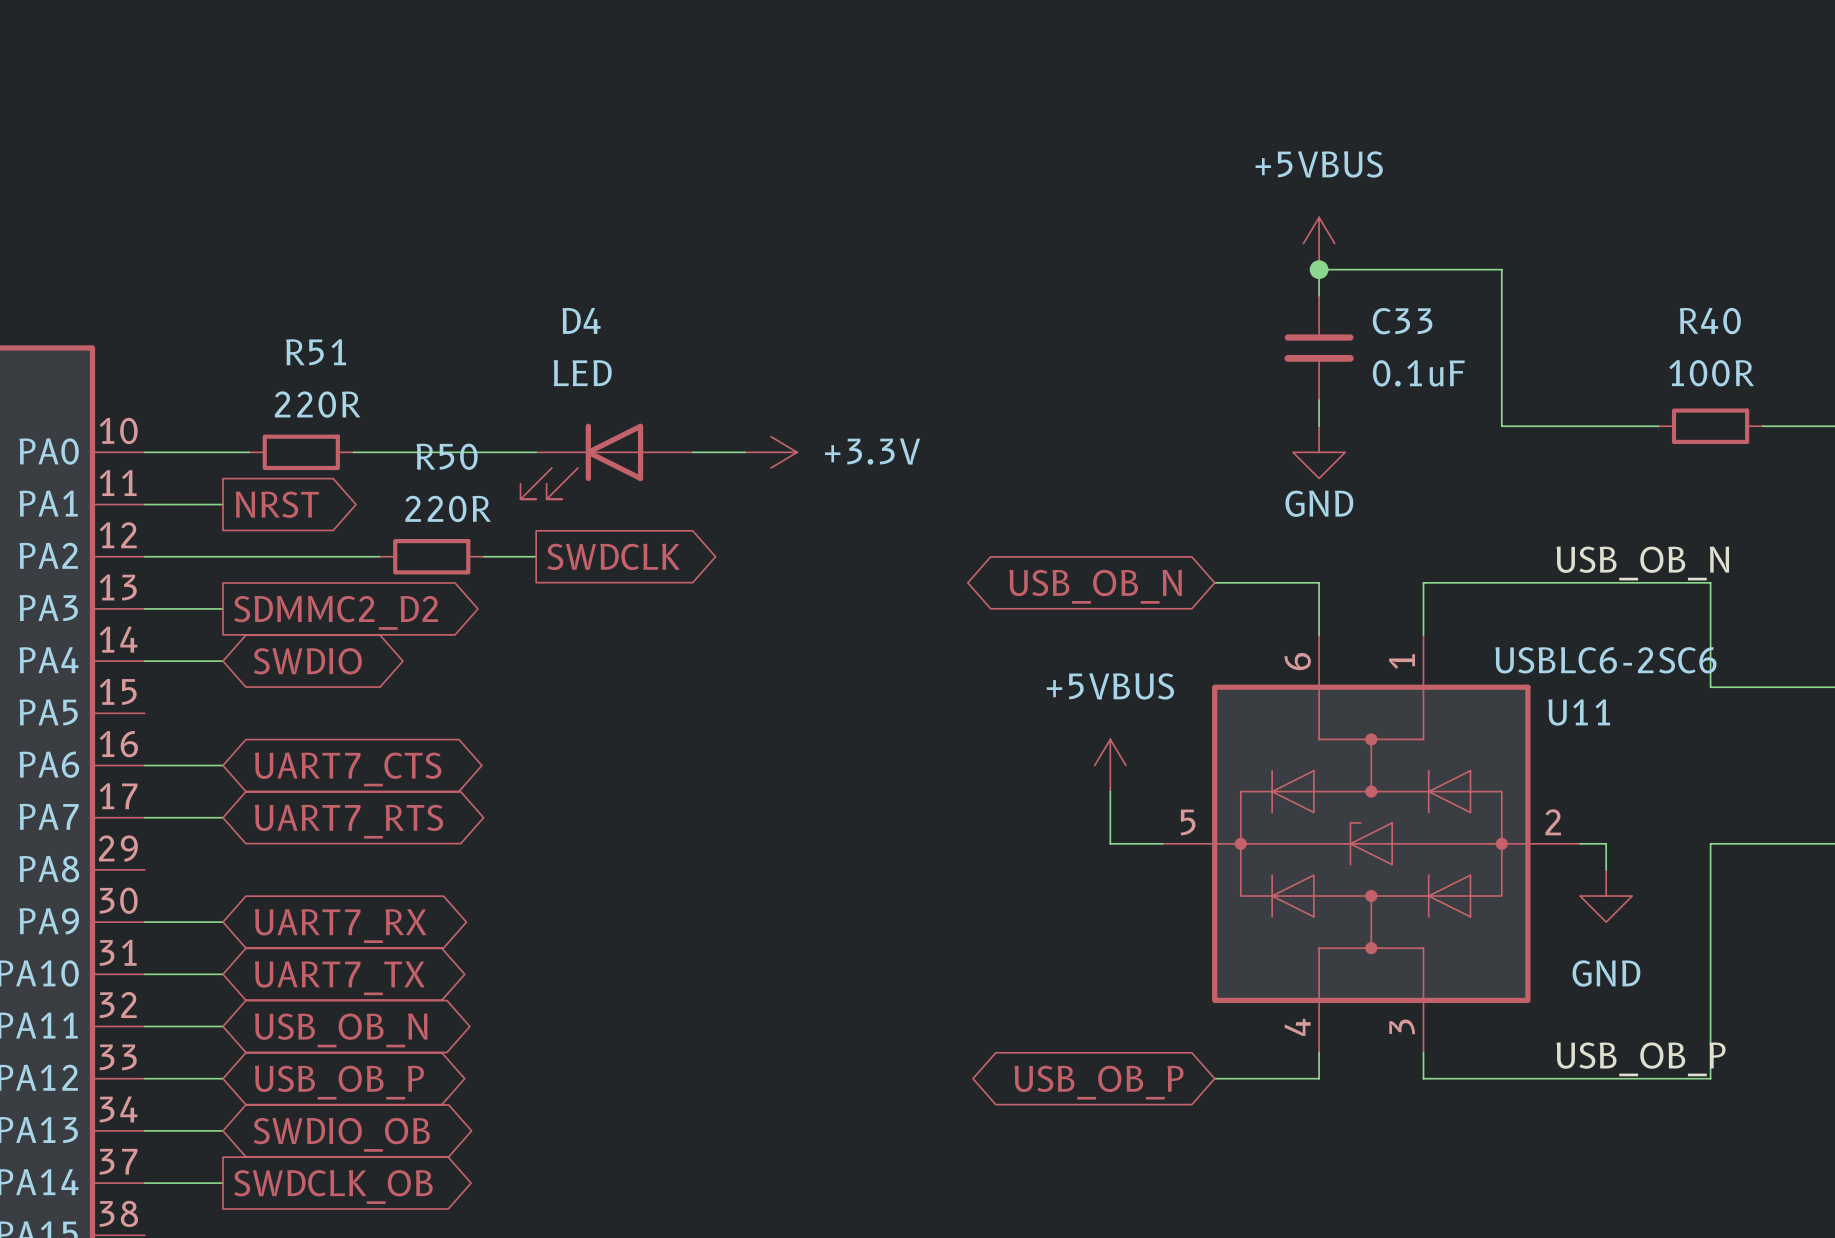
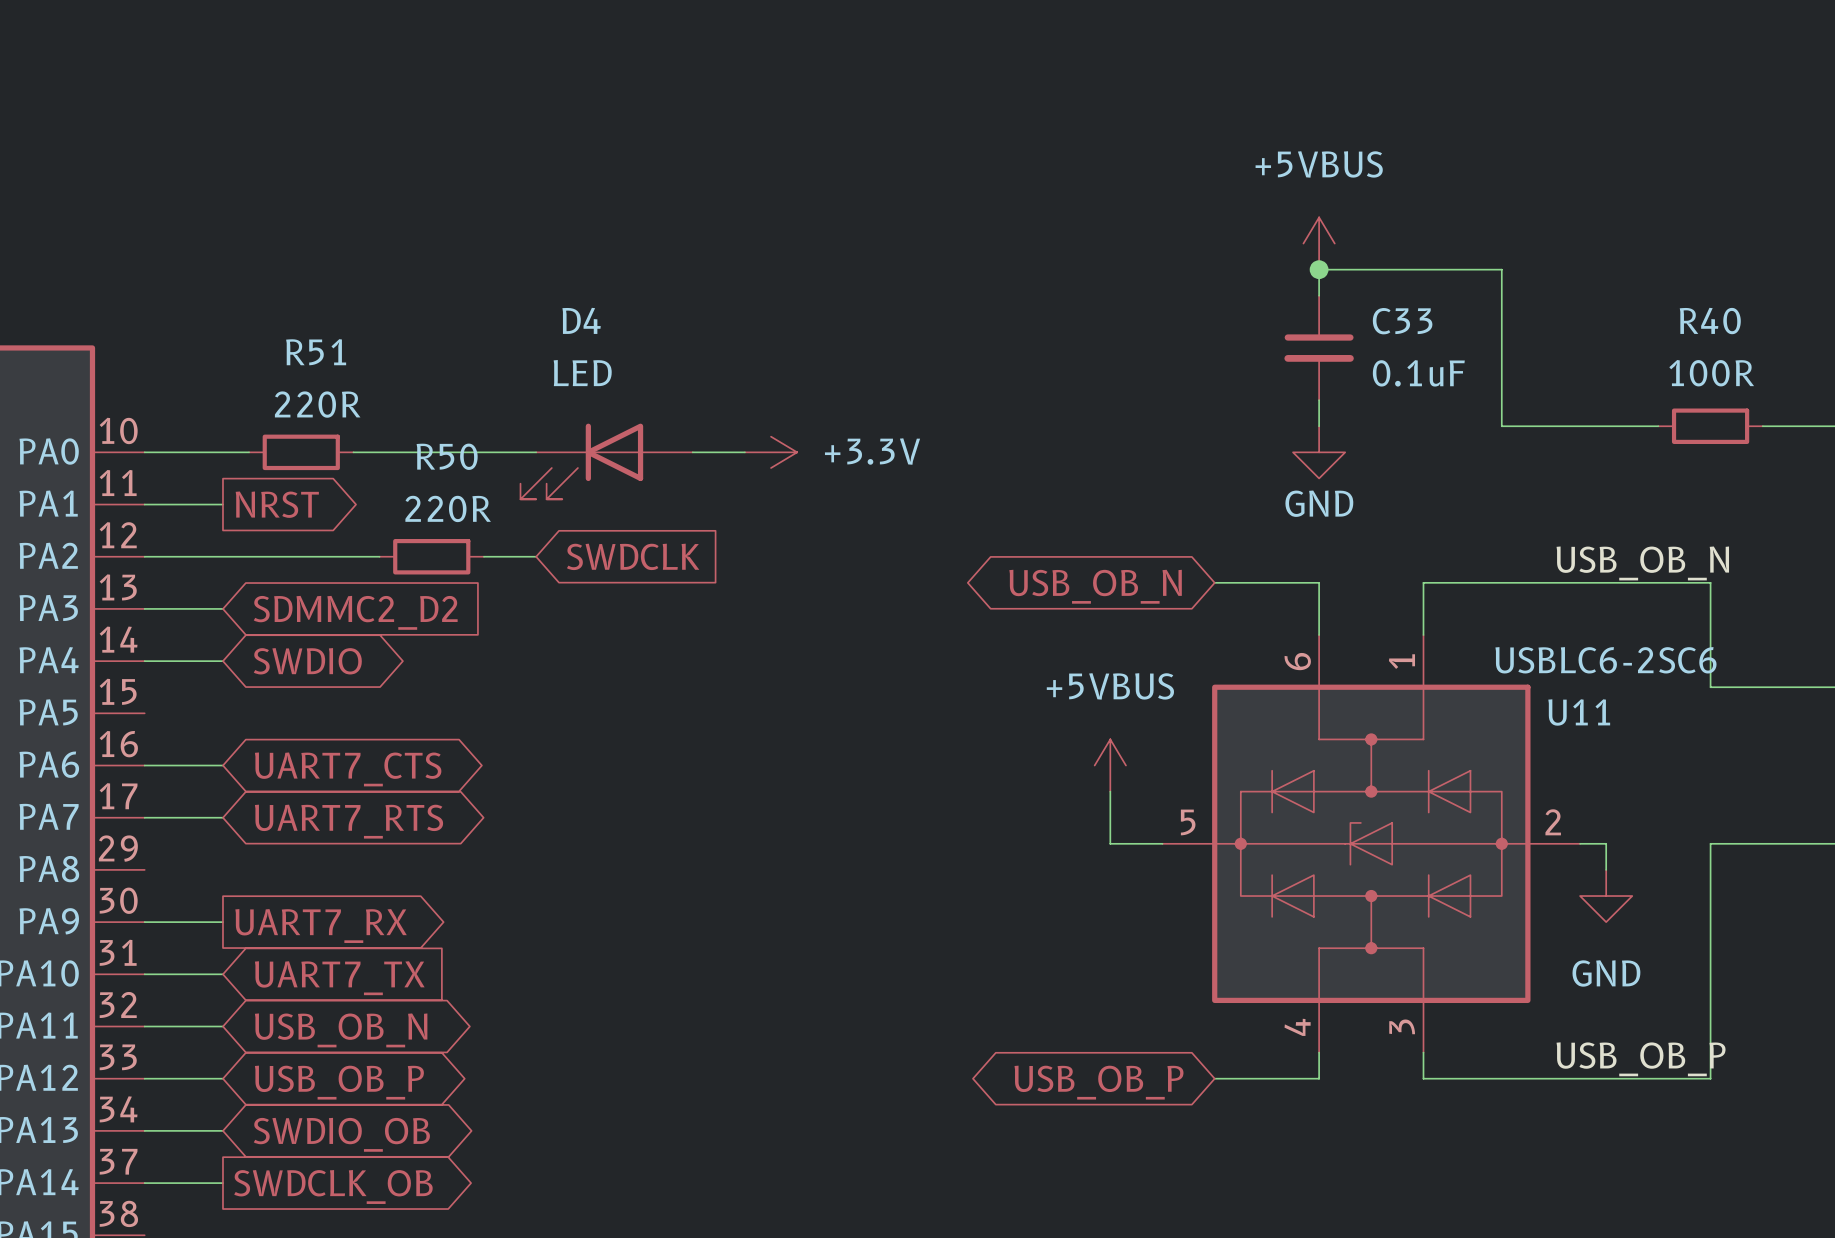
global label shape: output (613, 556) -> input (633, 556)
global label shape: output (336, 612) -> input (355, 612)
global label shape: bidirectional (340, 926) -> output (321, 926)
global label shape: bidirectional (339, 978) -> input (339, 978)

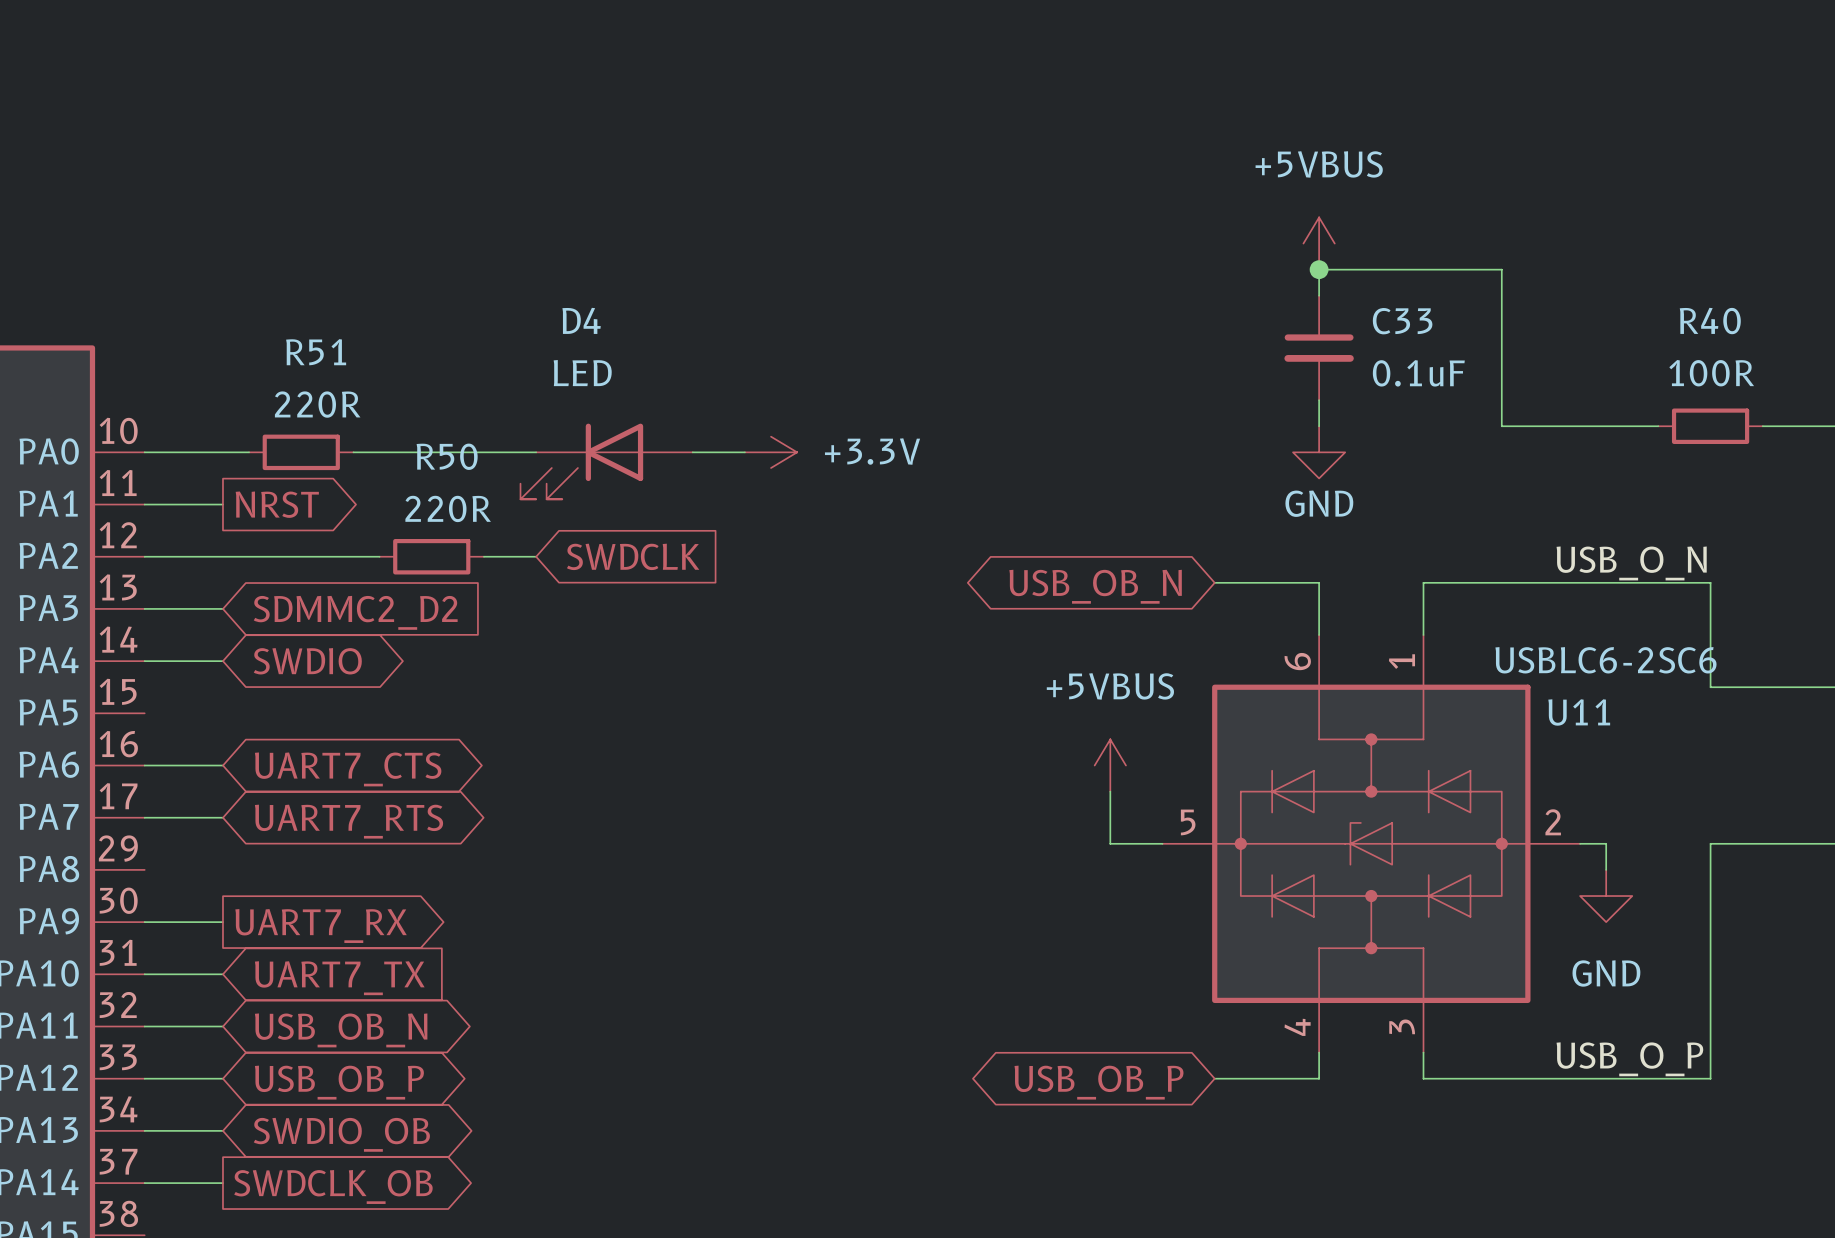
label: USB_OB_N (1642, 563) -> USB_O_N (1631, 563)
label: USB_OB_P (1641, 1059) -> USB_O_P (1629, 1059)

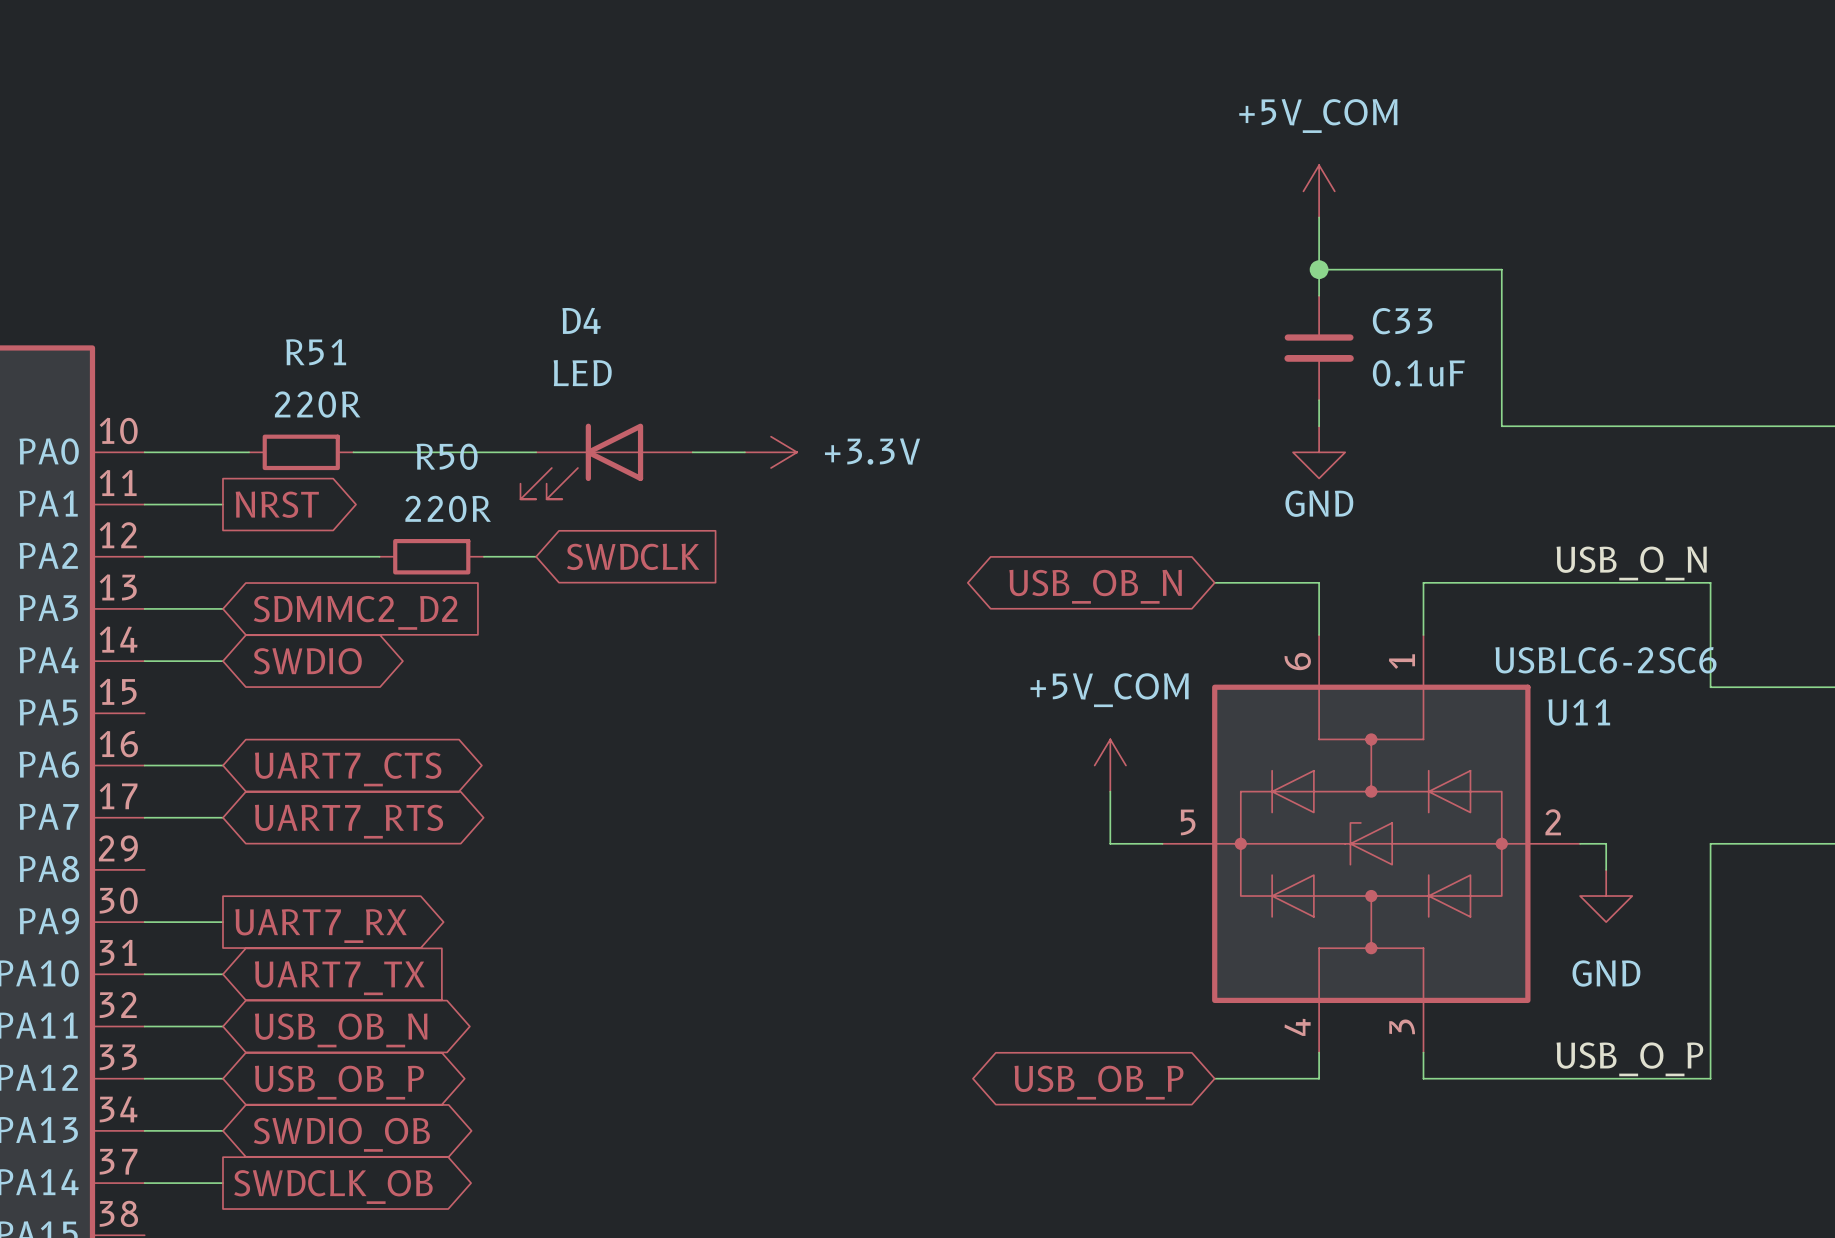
power symbol: none -> +5V_COM (1319, 191)
power symbol: +5VBUS (1319, 243) -> none
wire: none -> (1658, 426) (1762, 426)
R40: 100R (1710, 426) -> none
power symbol: +5VBUS (1110, 765) -> +5V_COM (1110, 765)

